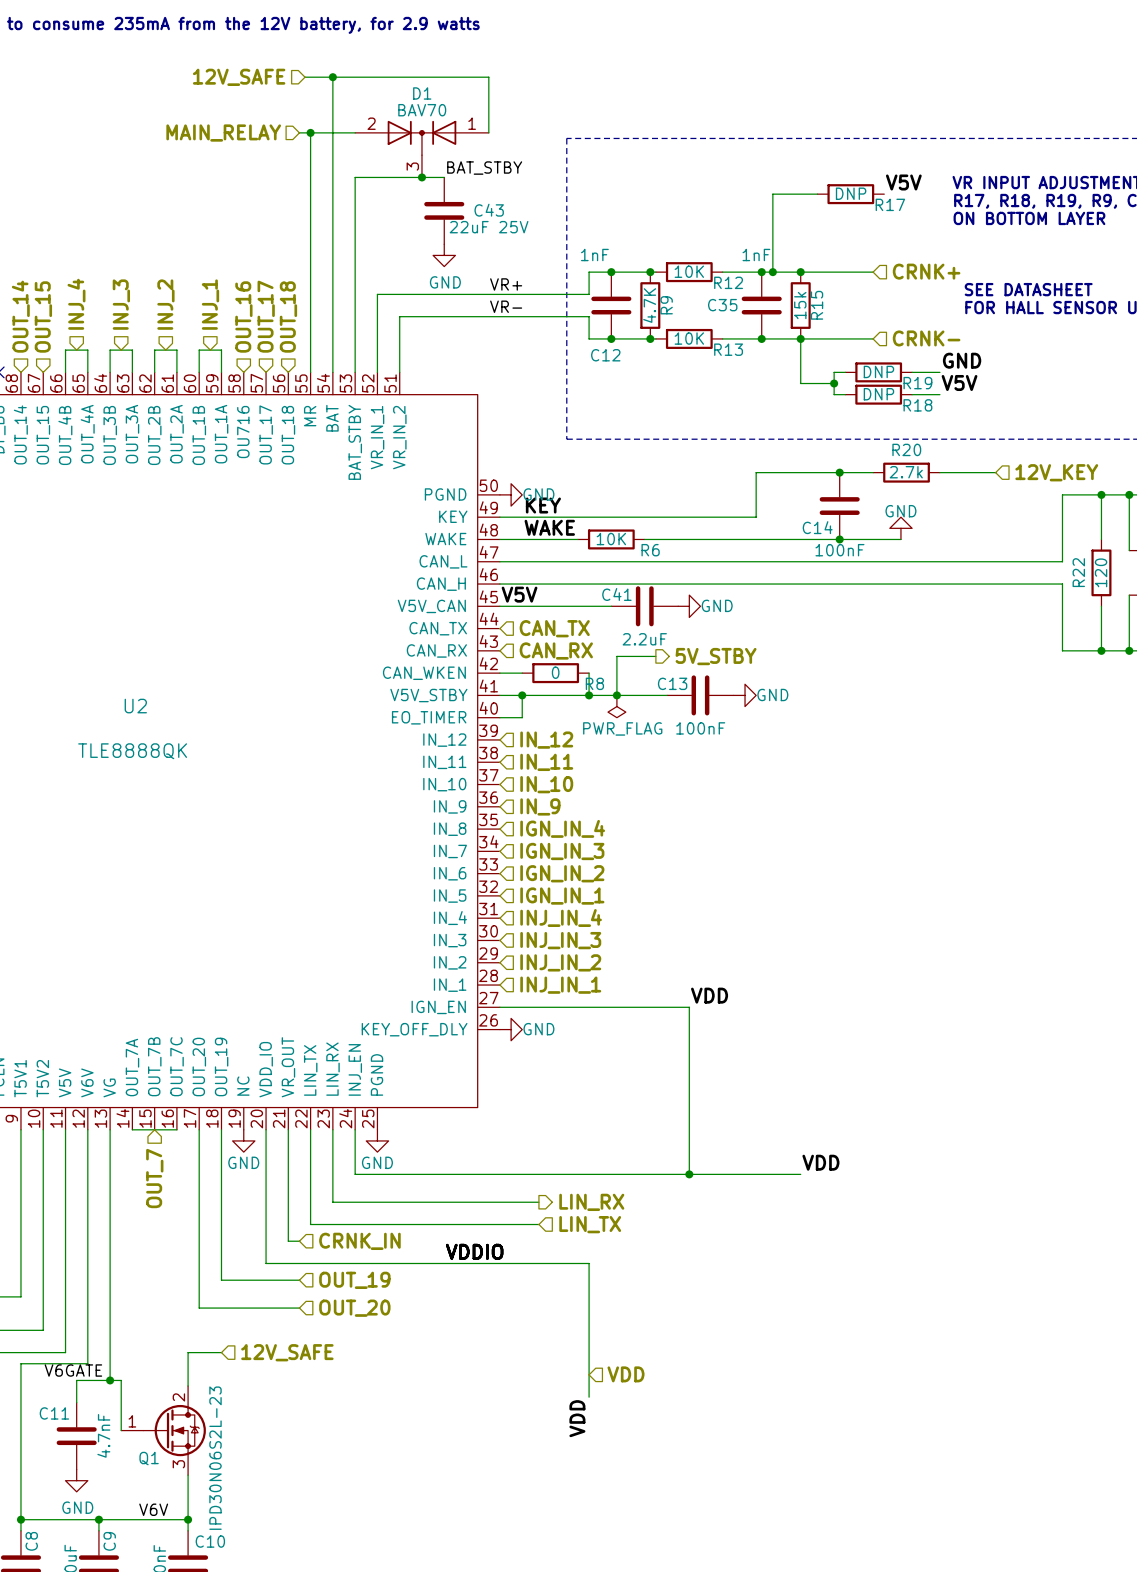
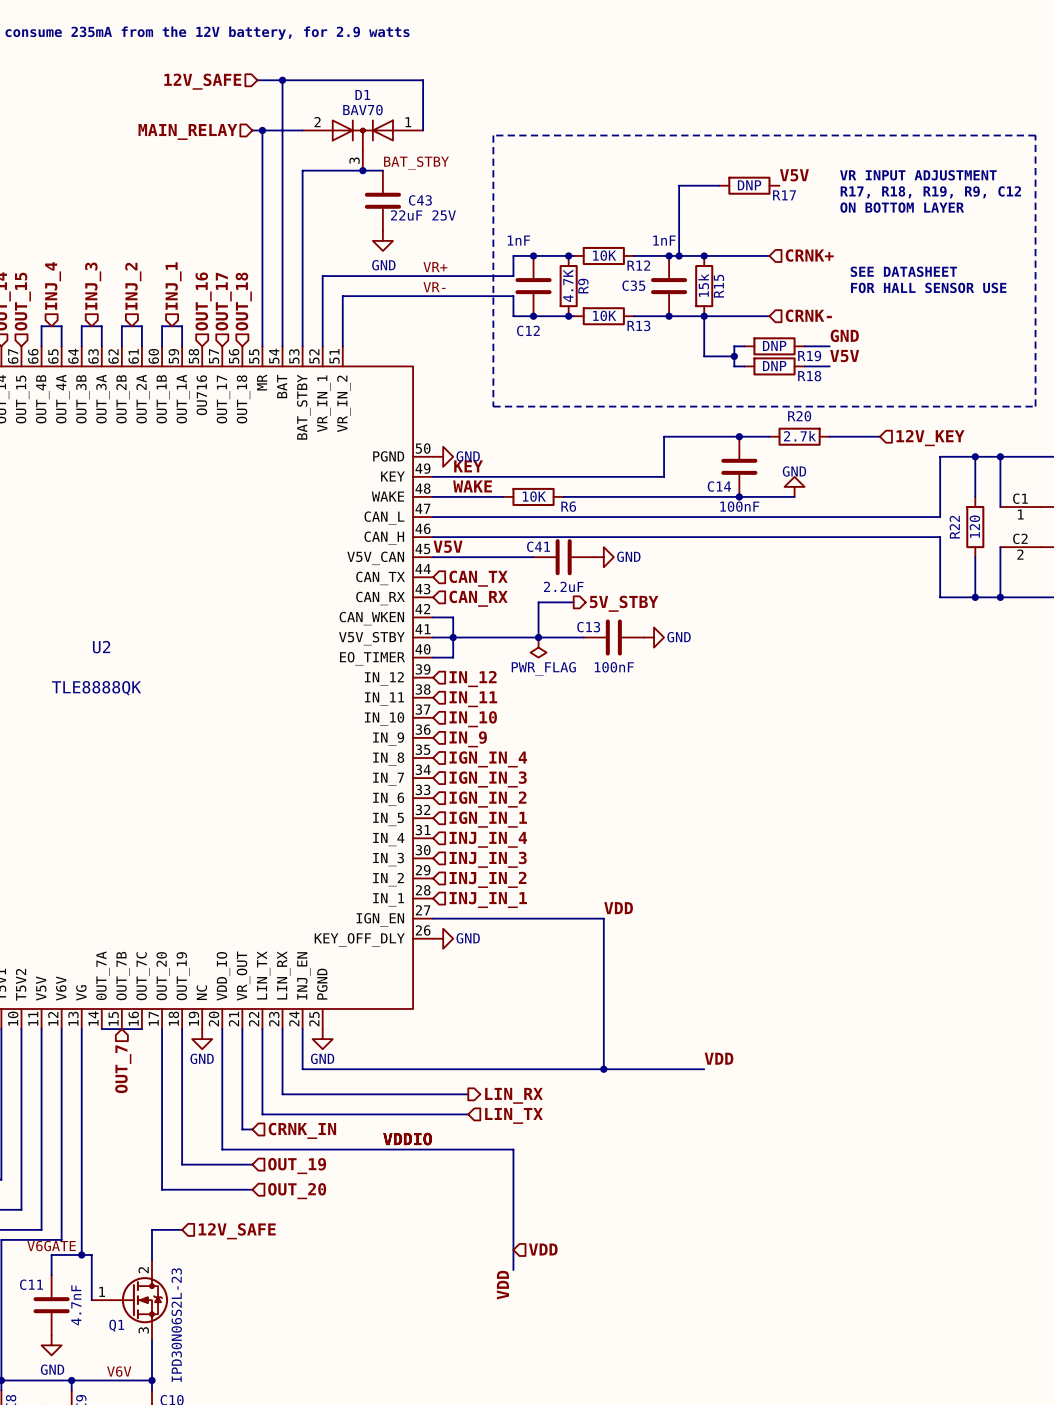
R8: 0 (555, 673) -> none
wire: (589, 673) (589, 695) -> (453, 617) (453, 637)
junction: (589, 695) -> none

